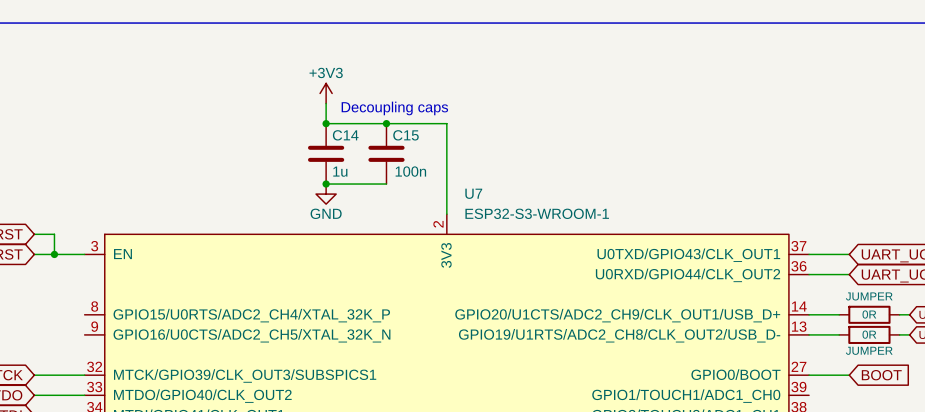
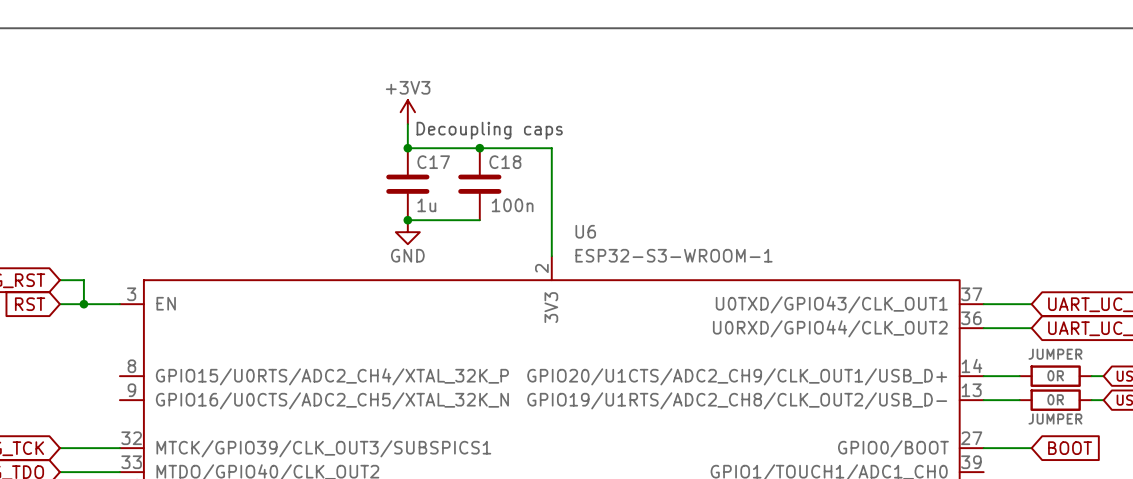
C14 name: C14 (345, 135) -> C17 (433, 162)
C15 name: C15 (405, 135) -> C18 (505, 162)
U7 name: U7 (473, 193) -> U6 (585, 231)

